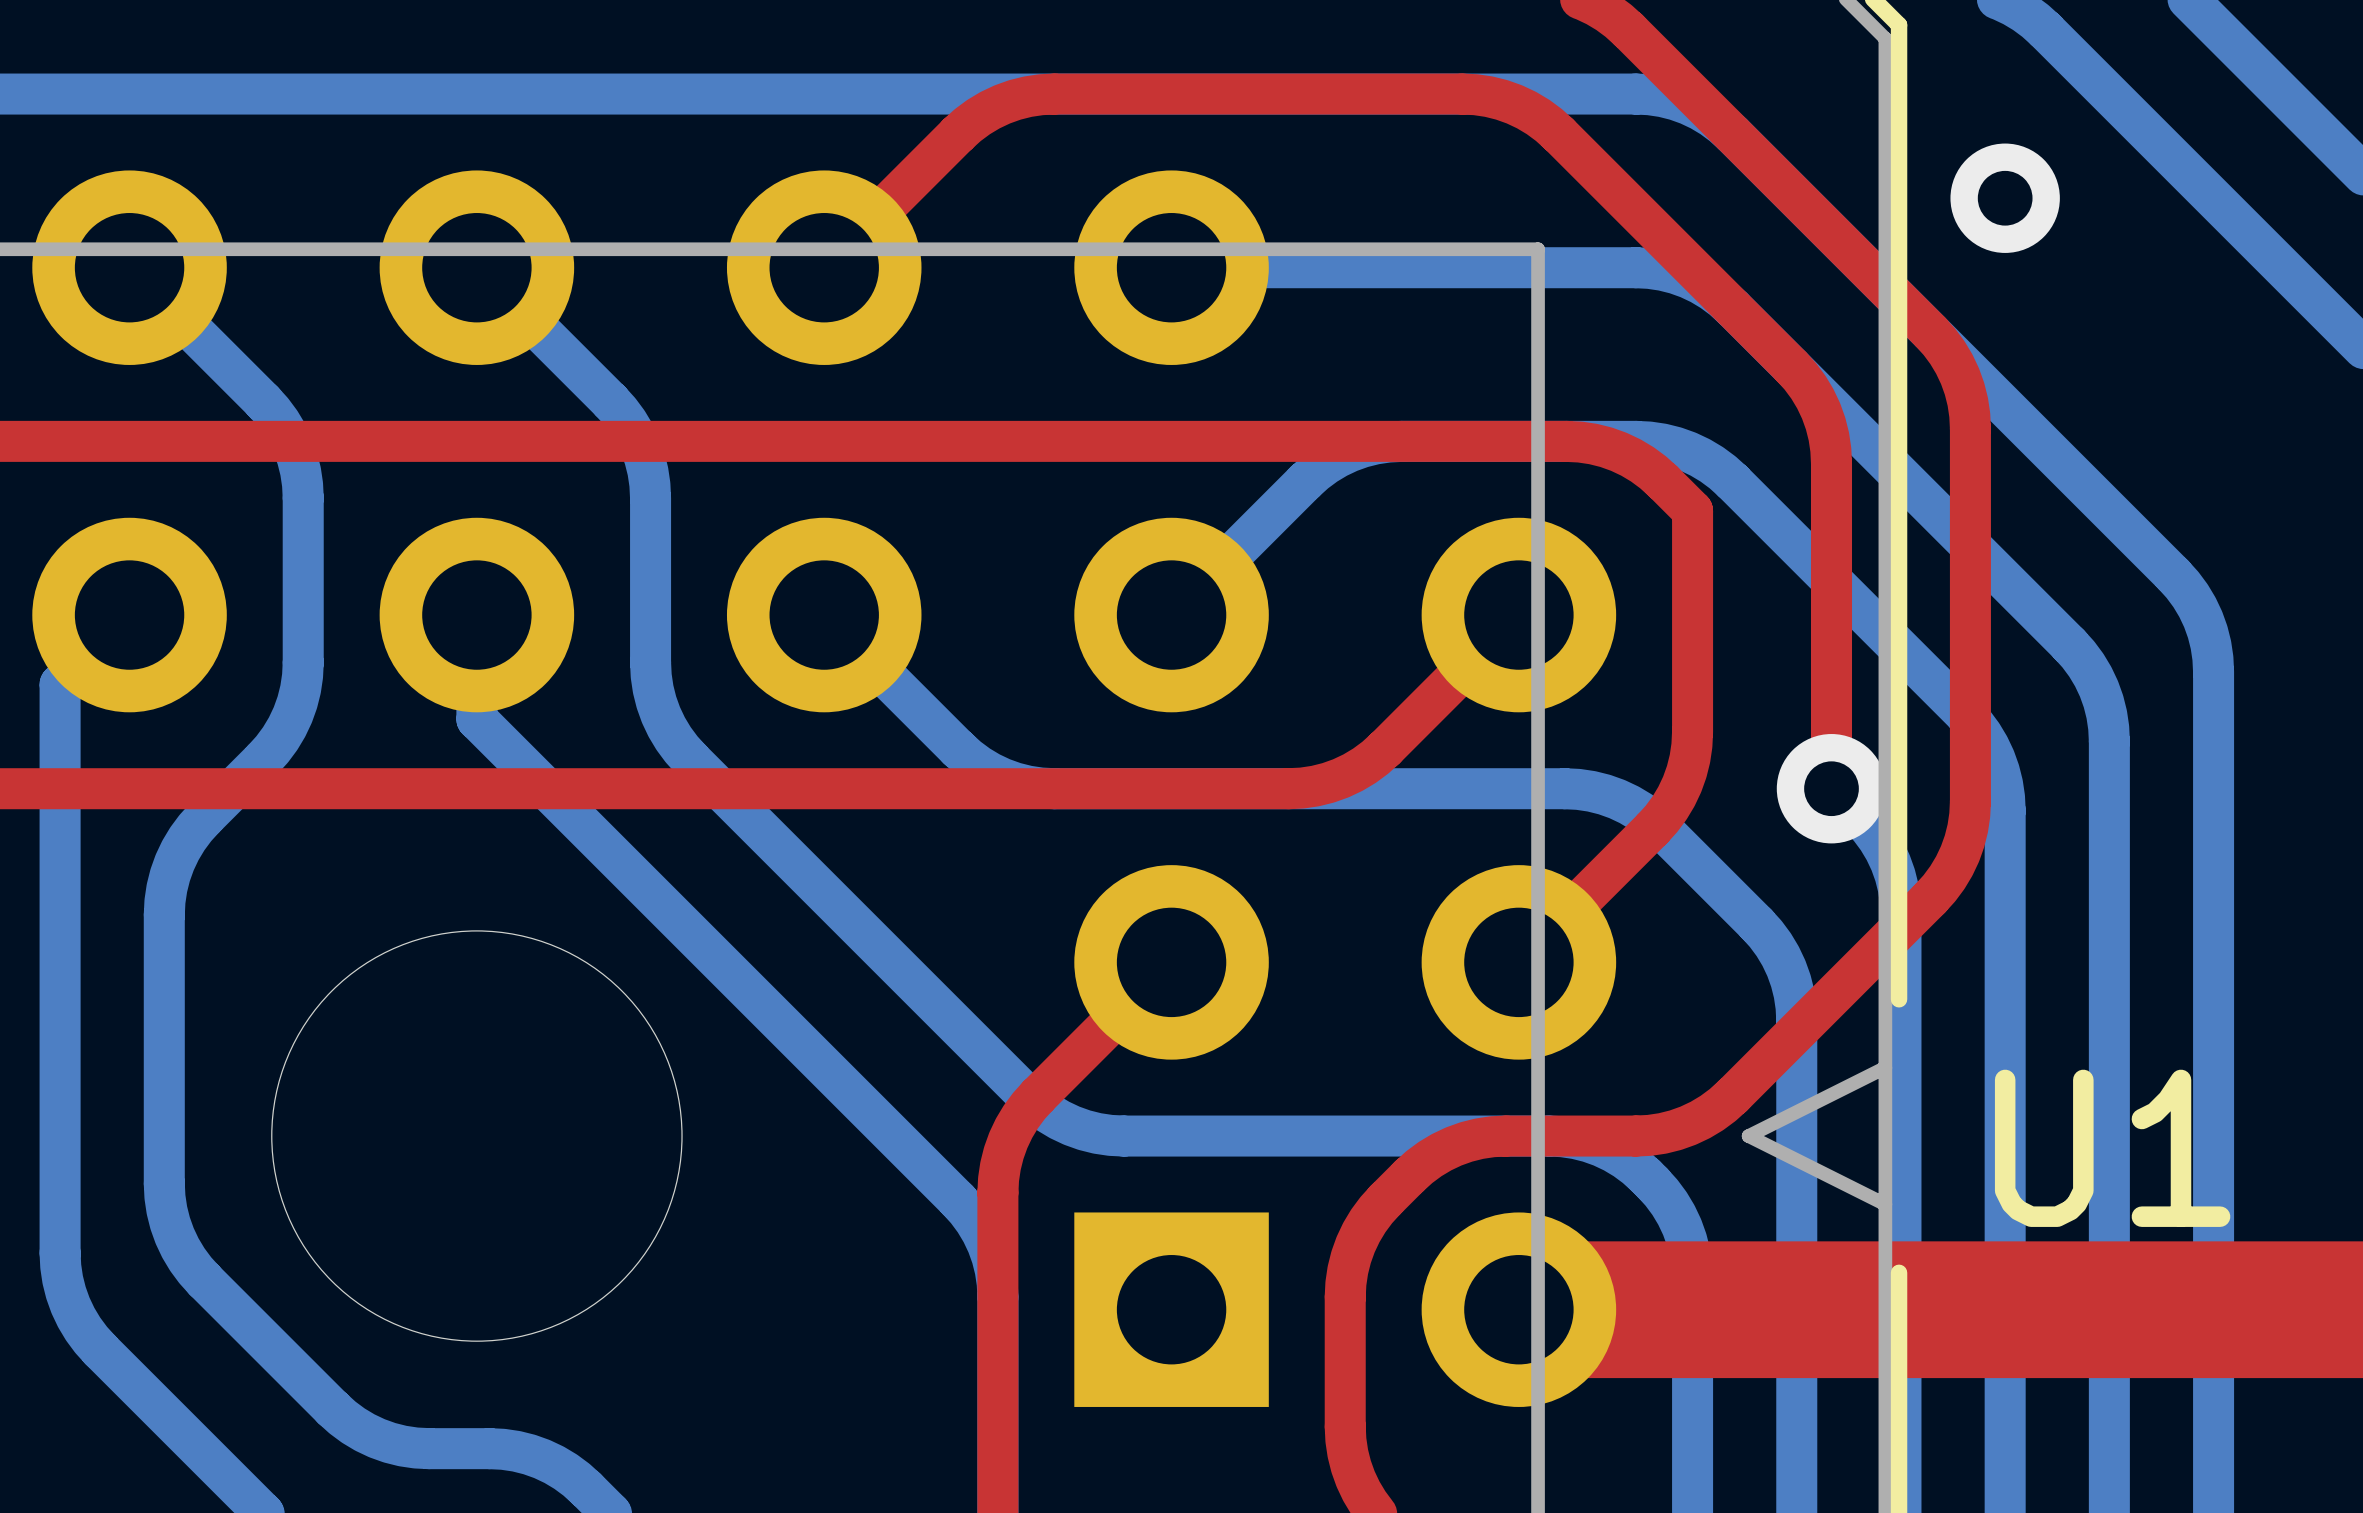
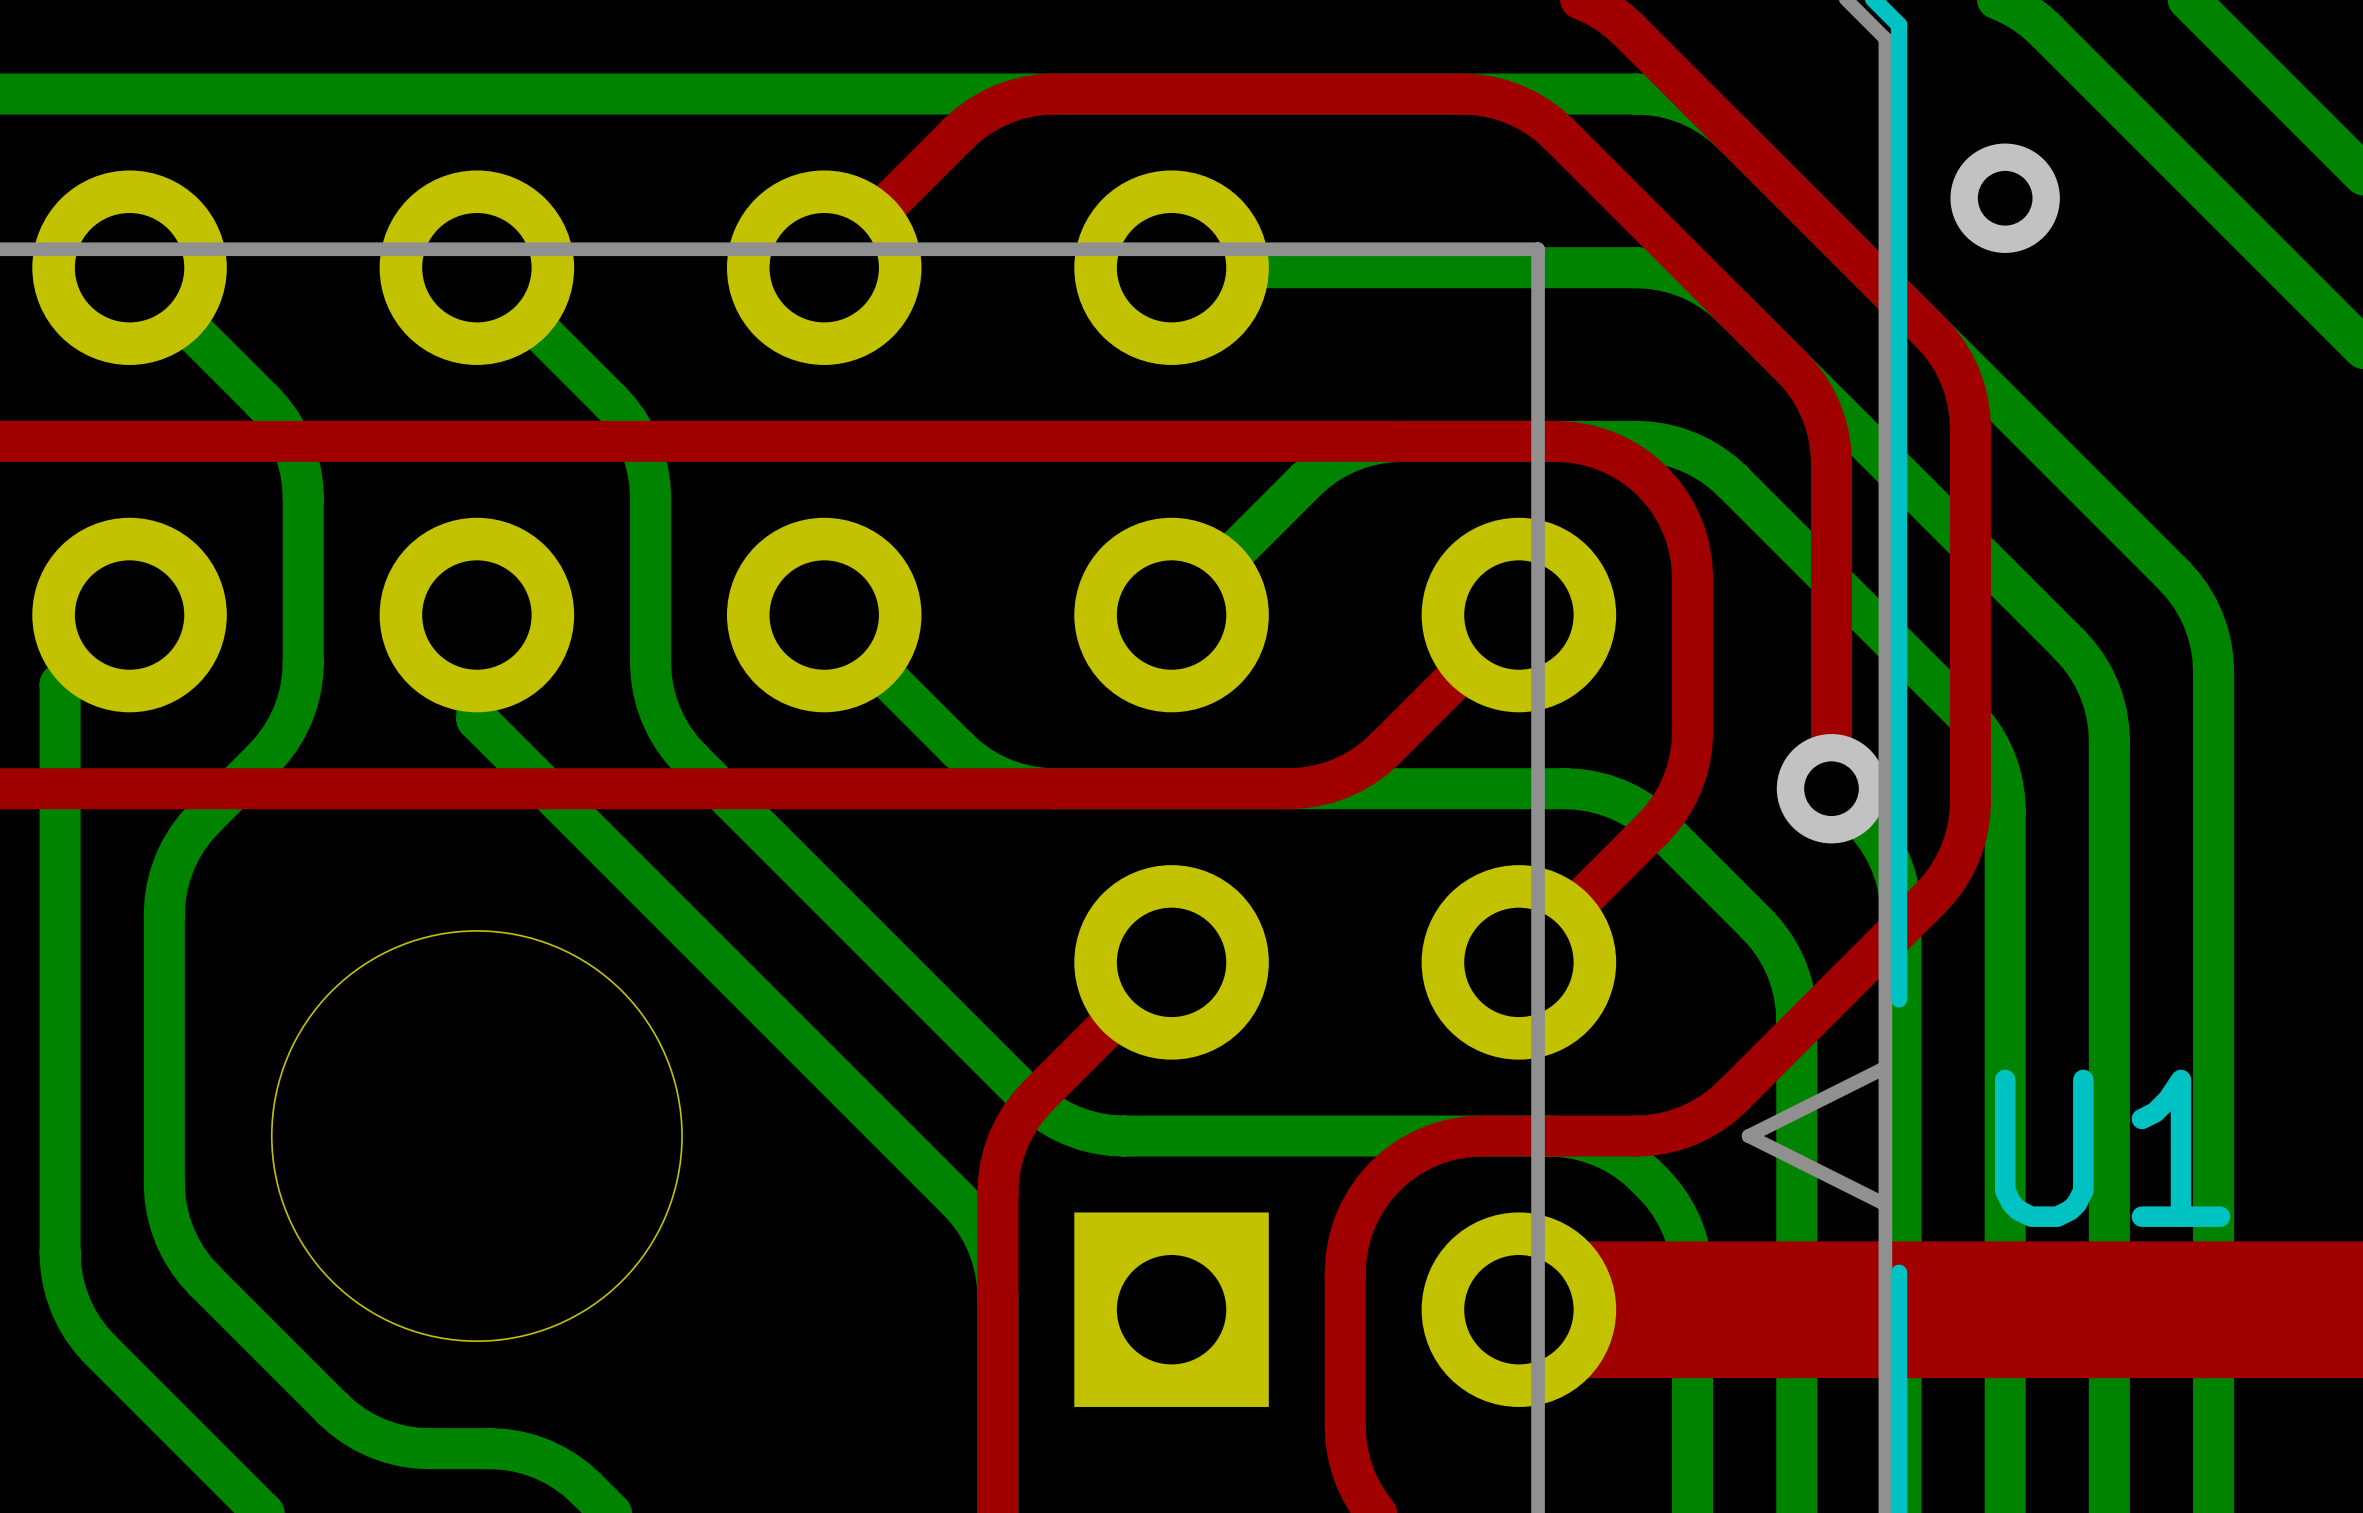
top track: (1555, 441) (1593, 444) (1630, 457) (1653, 472) (1692, 510) (1692, 578) -> (1555, 441) (1586, 444) (1615, 454) (1641, 471) (1652, 481) (1671, 505) (1684, 532) (1689, 547) (1692, 578)
top track: (1506, 1136) (1479, 1138) (1453, 1146) (1430, 1159) (1409, 1176) (1376, 1210) (1361, 1232) (1347, 1270) (1345, 1296) -> (1506, 1136) (1466, 1136) (1436, 1143) (1409, 1157) (1385, 1176) (1366, 1200) (1352, 1227) (1346, 1257) (1345, 1296)

